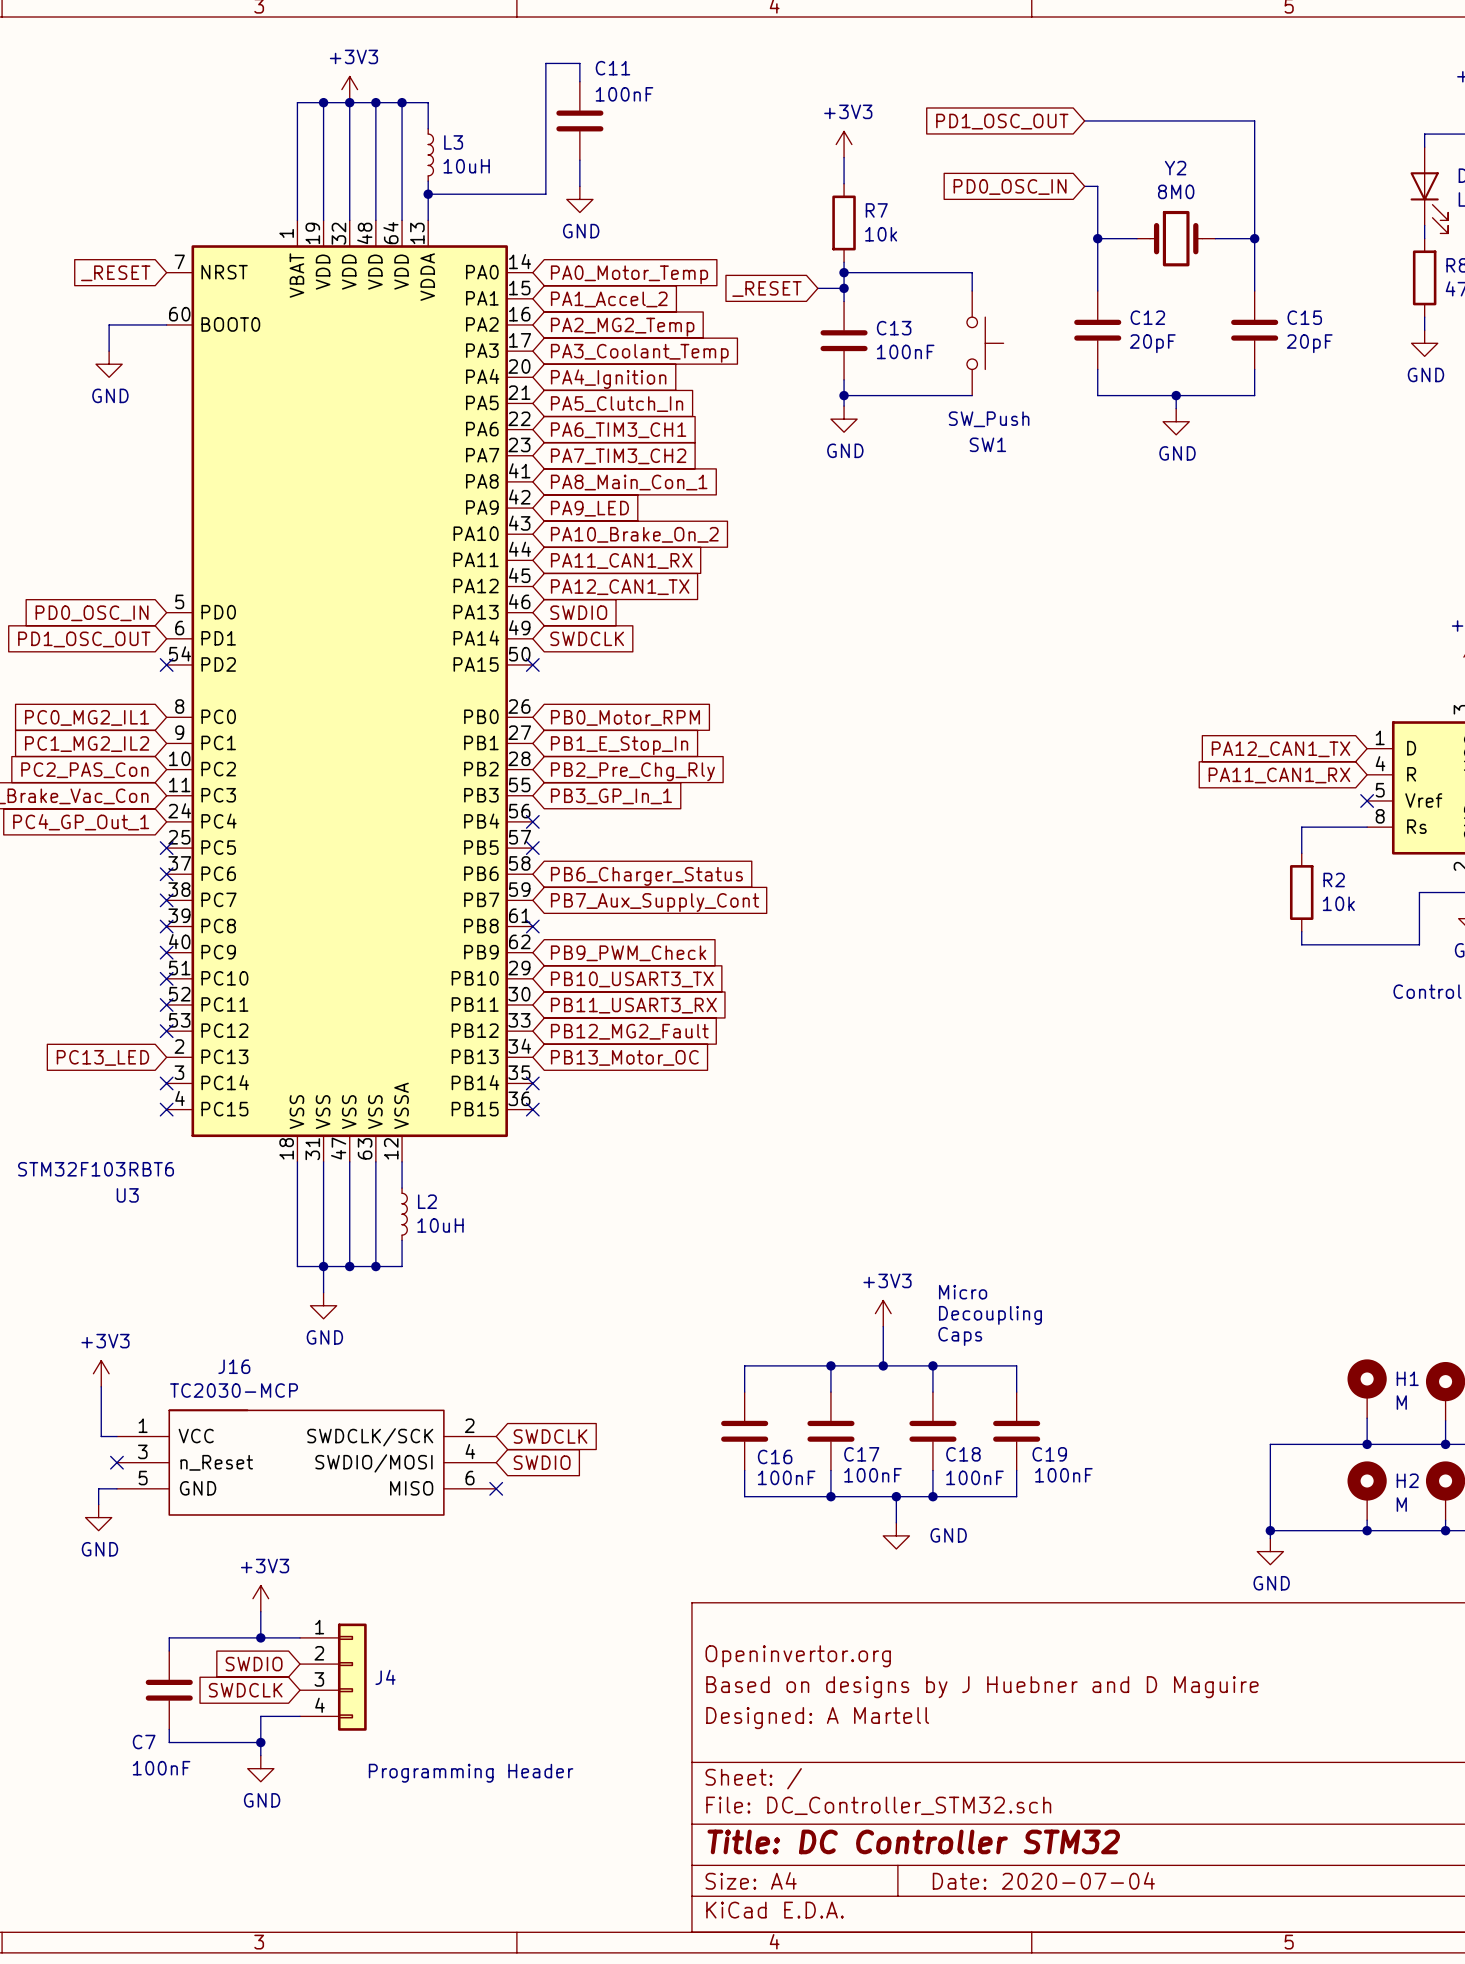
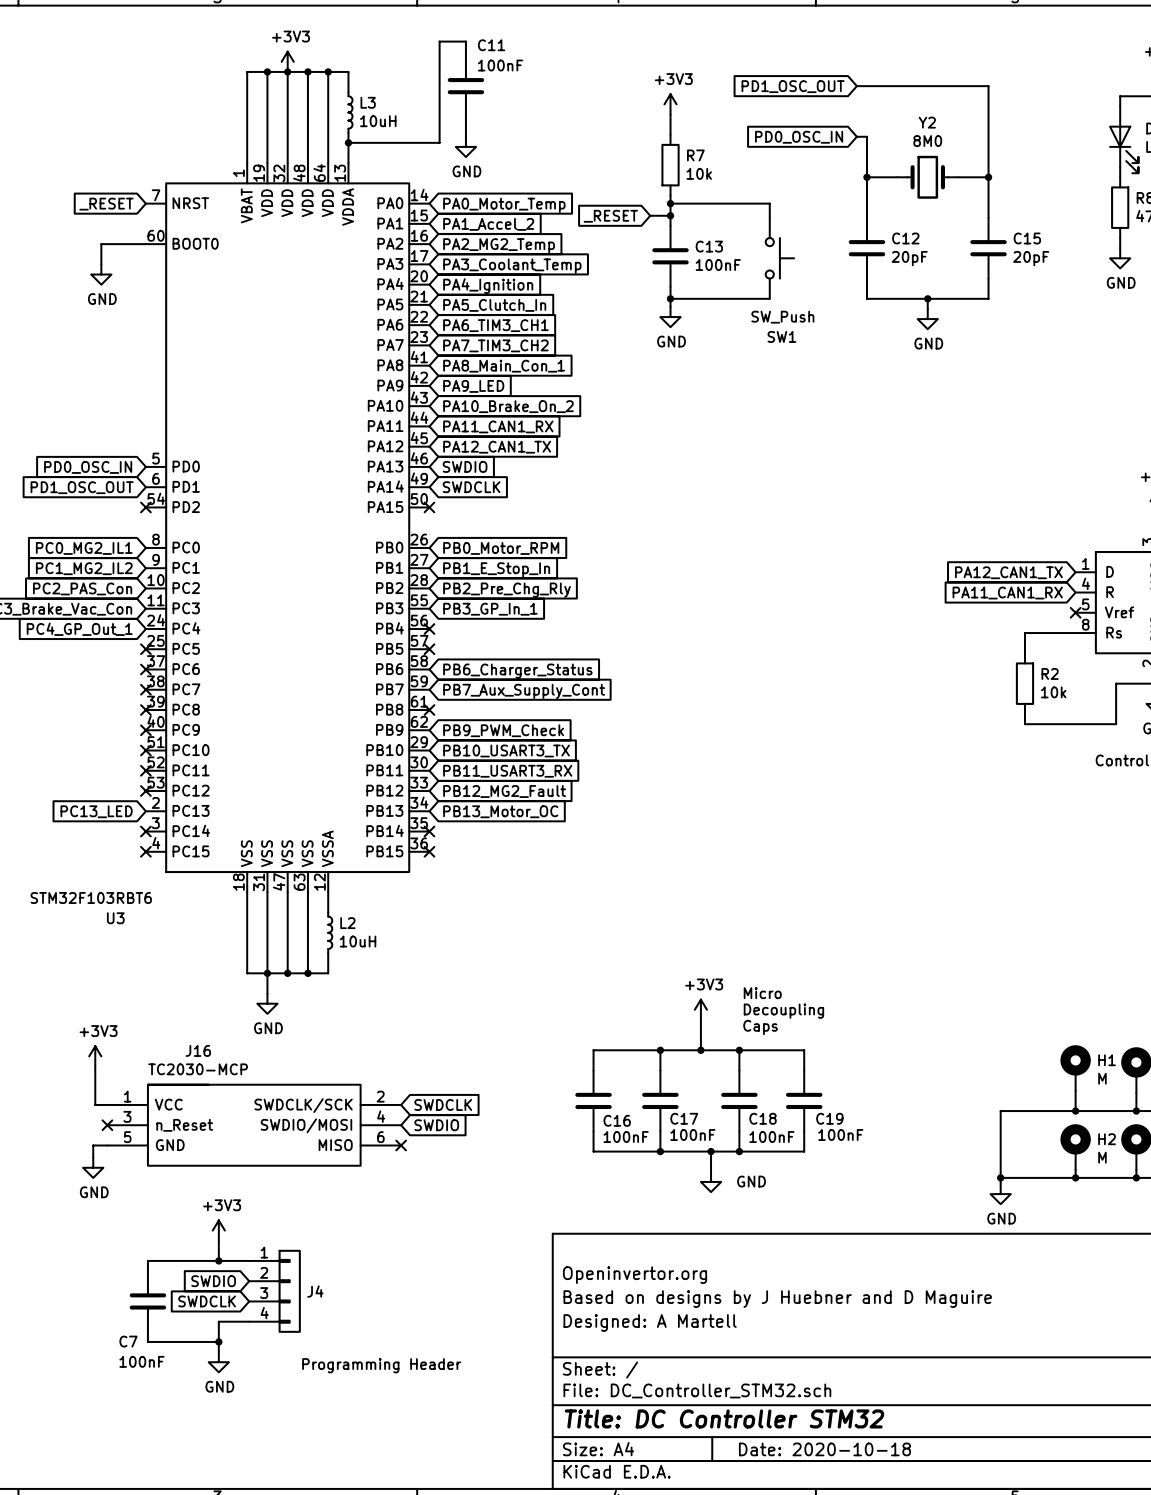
title block: Date: 2020-07-04 (1043, 1880) -> Date: 2020-10-18 (824, 1449)

